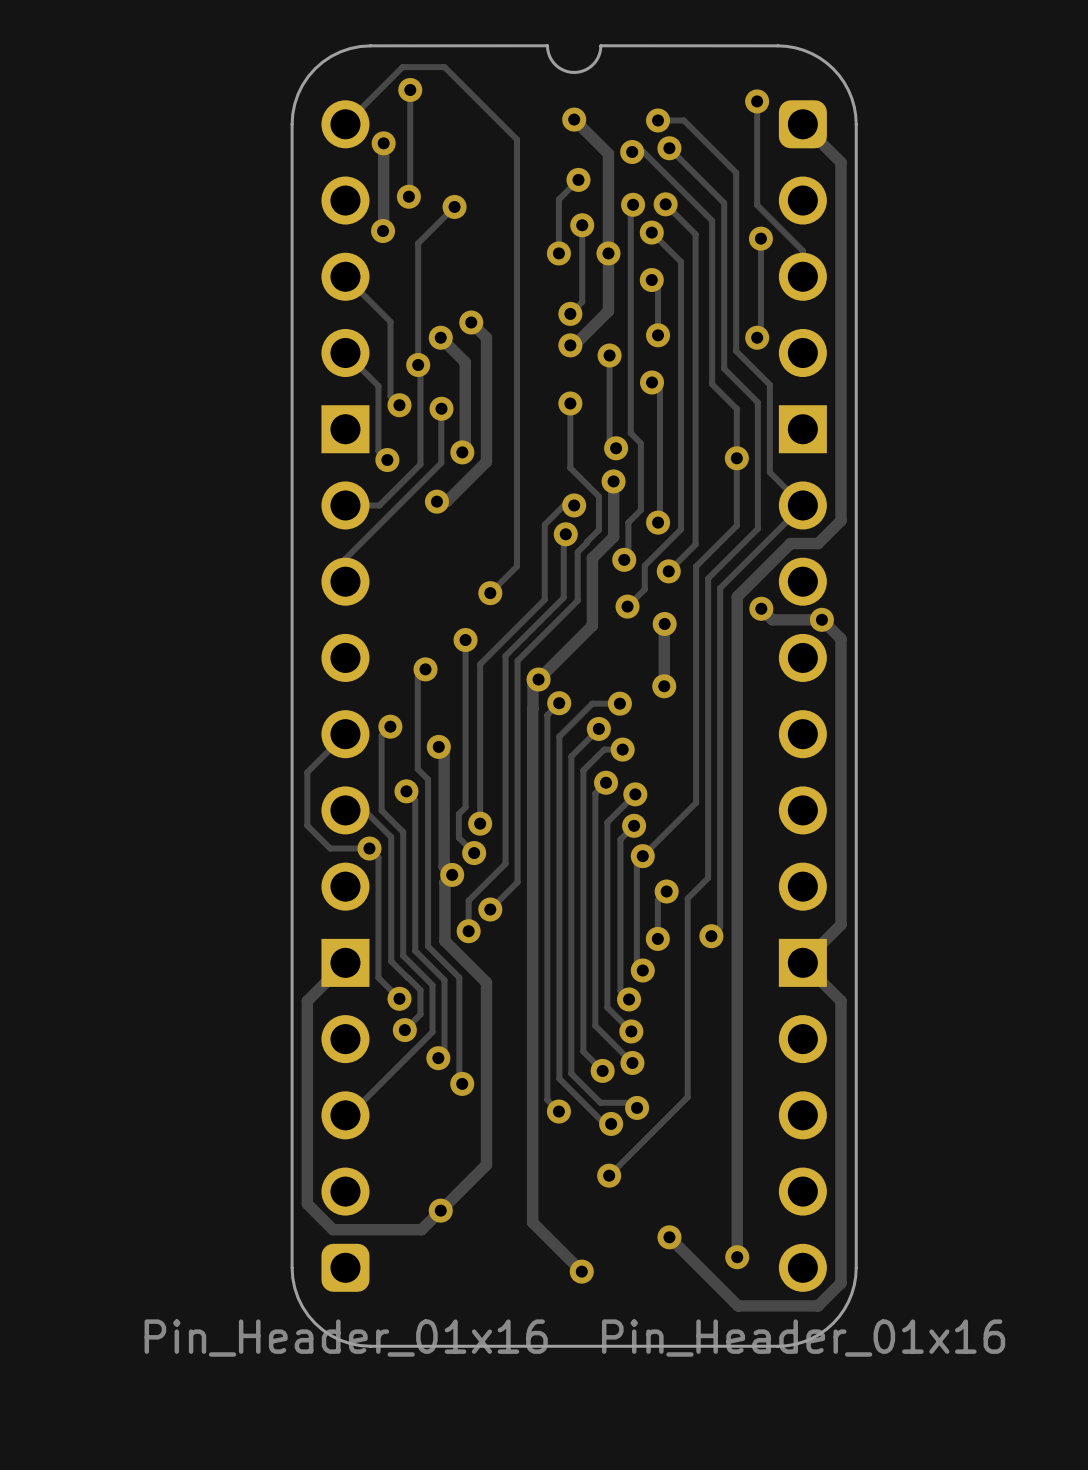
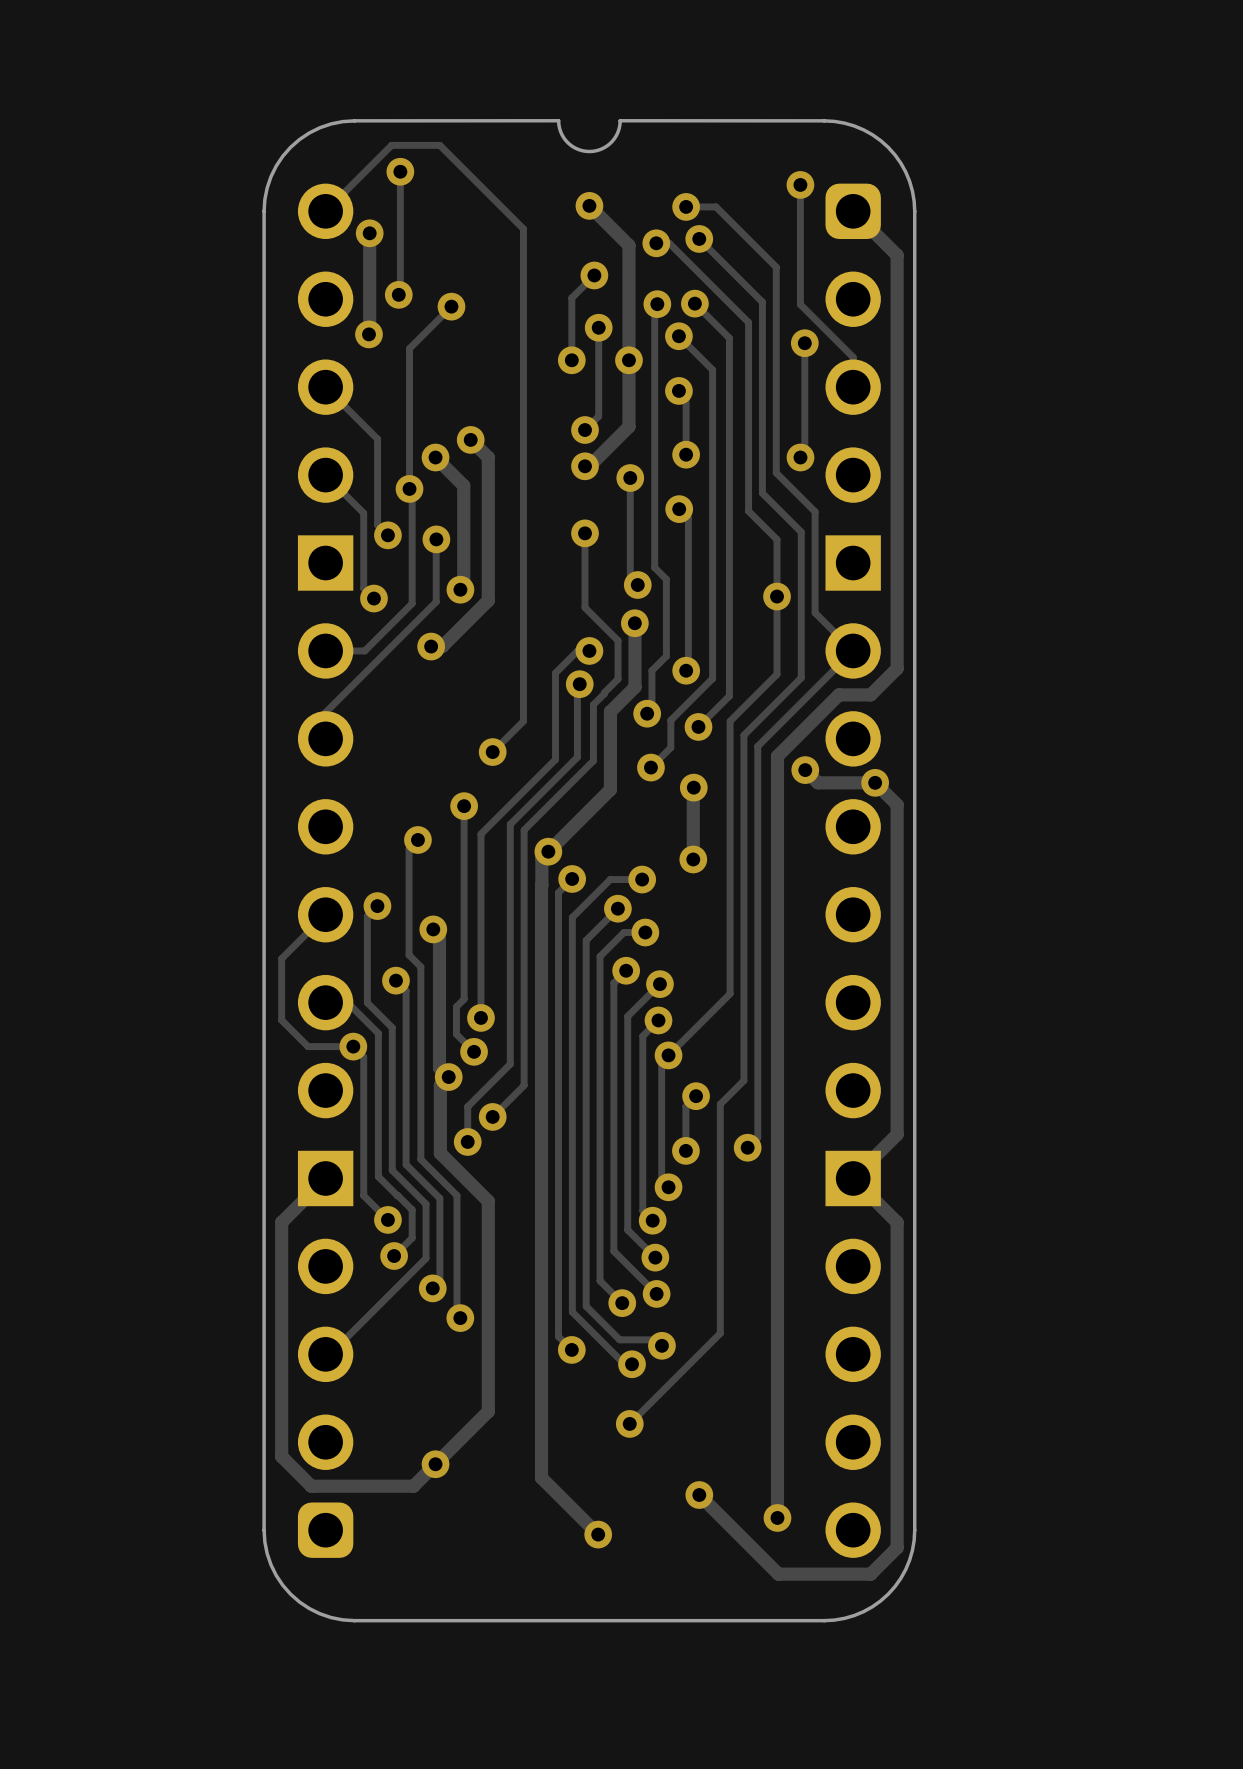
drawing: [144, 1319, 1006, 1357] -> none

